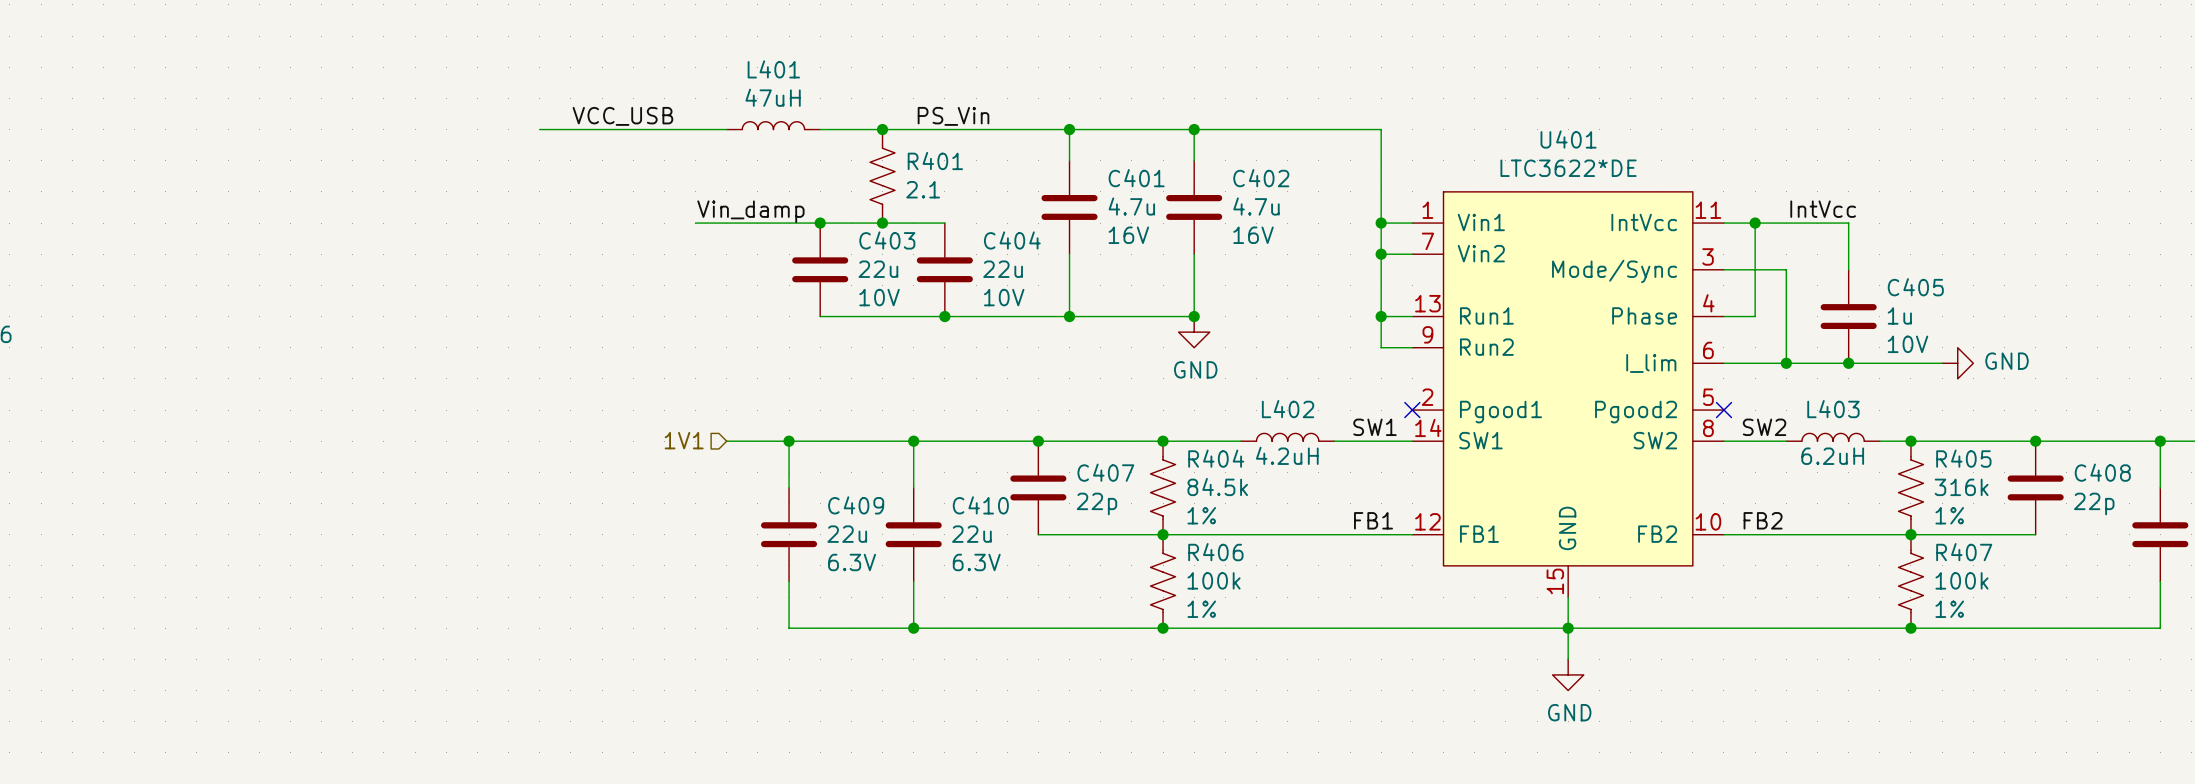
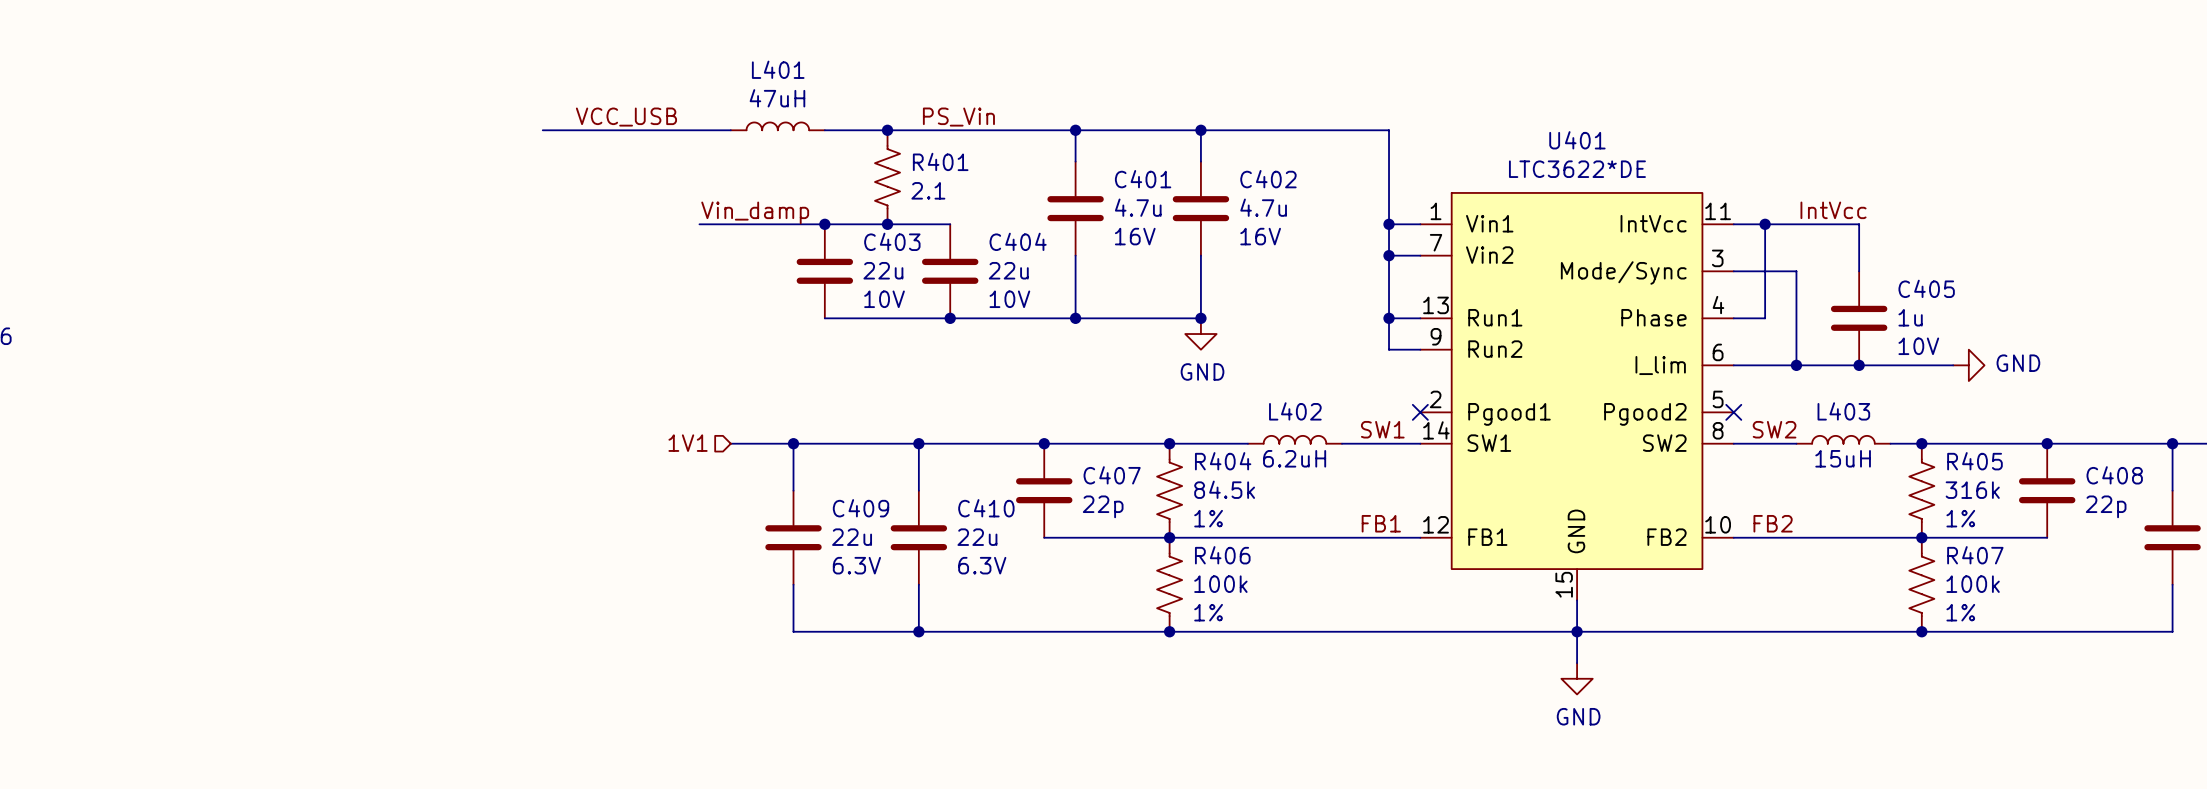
L402 value: 4.2uH (1287, 455) -> 6.2uH (1294, 458)
L403 value: 6.2uH (1832, 456) -> 15uH (1843, 458)

